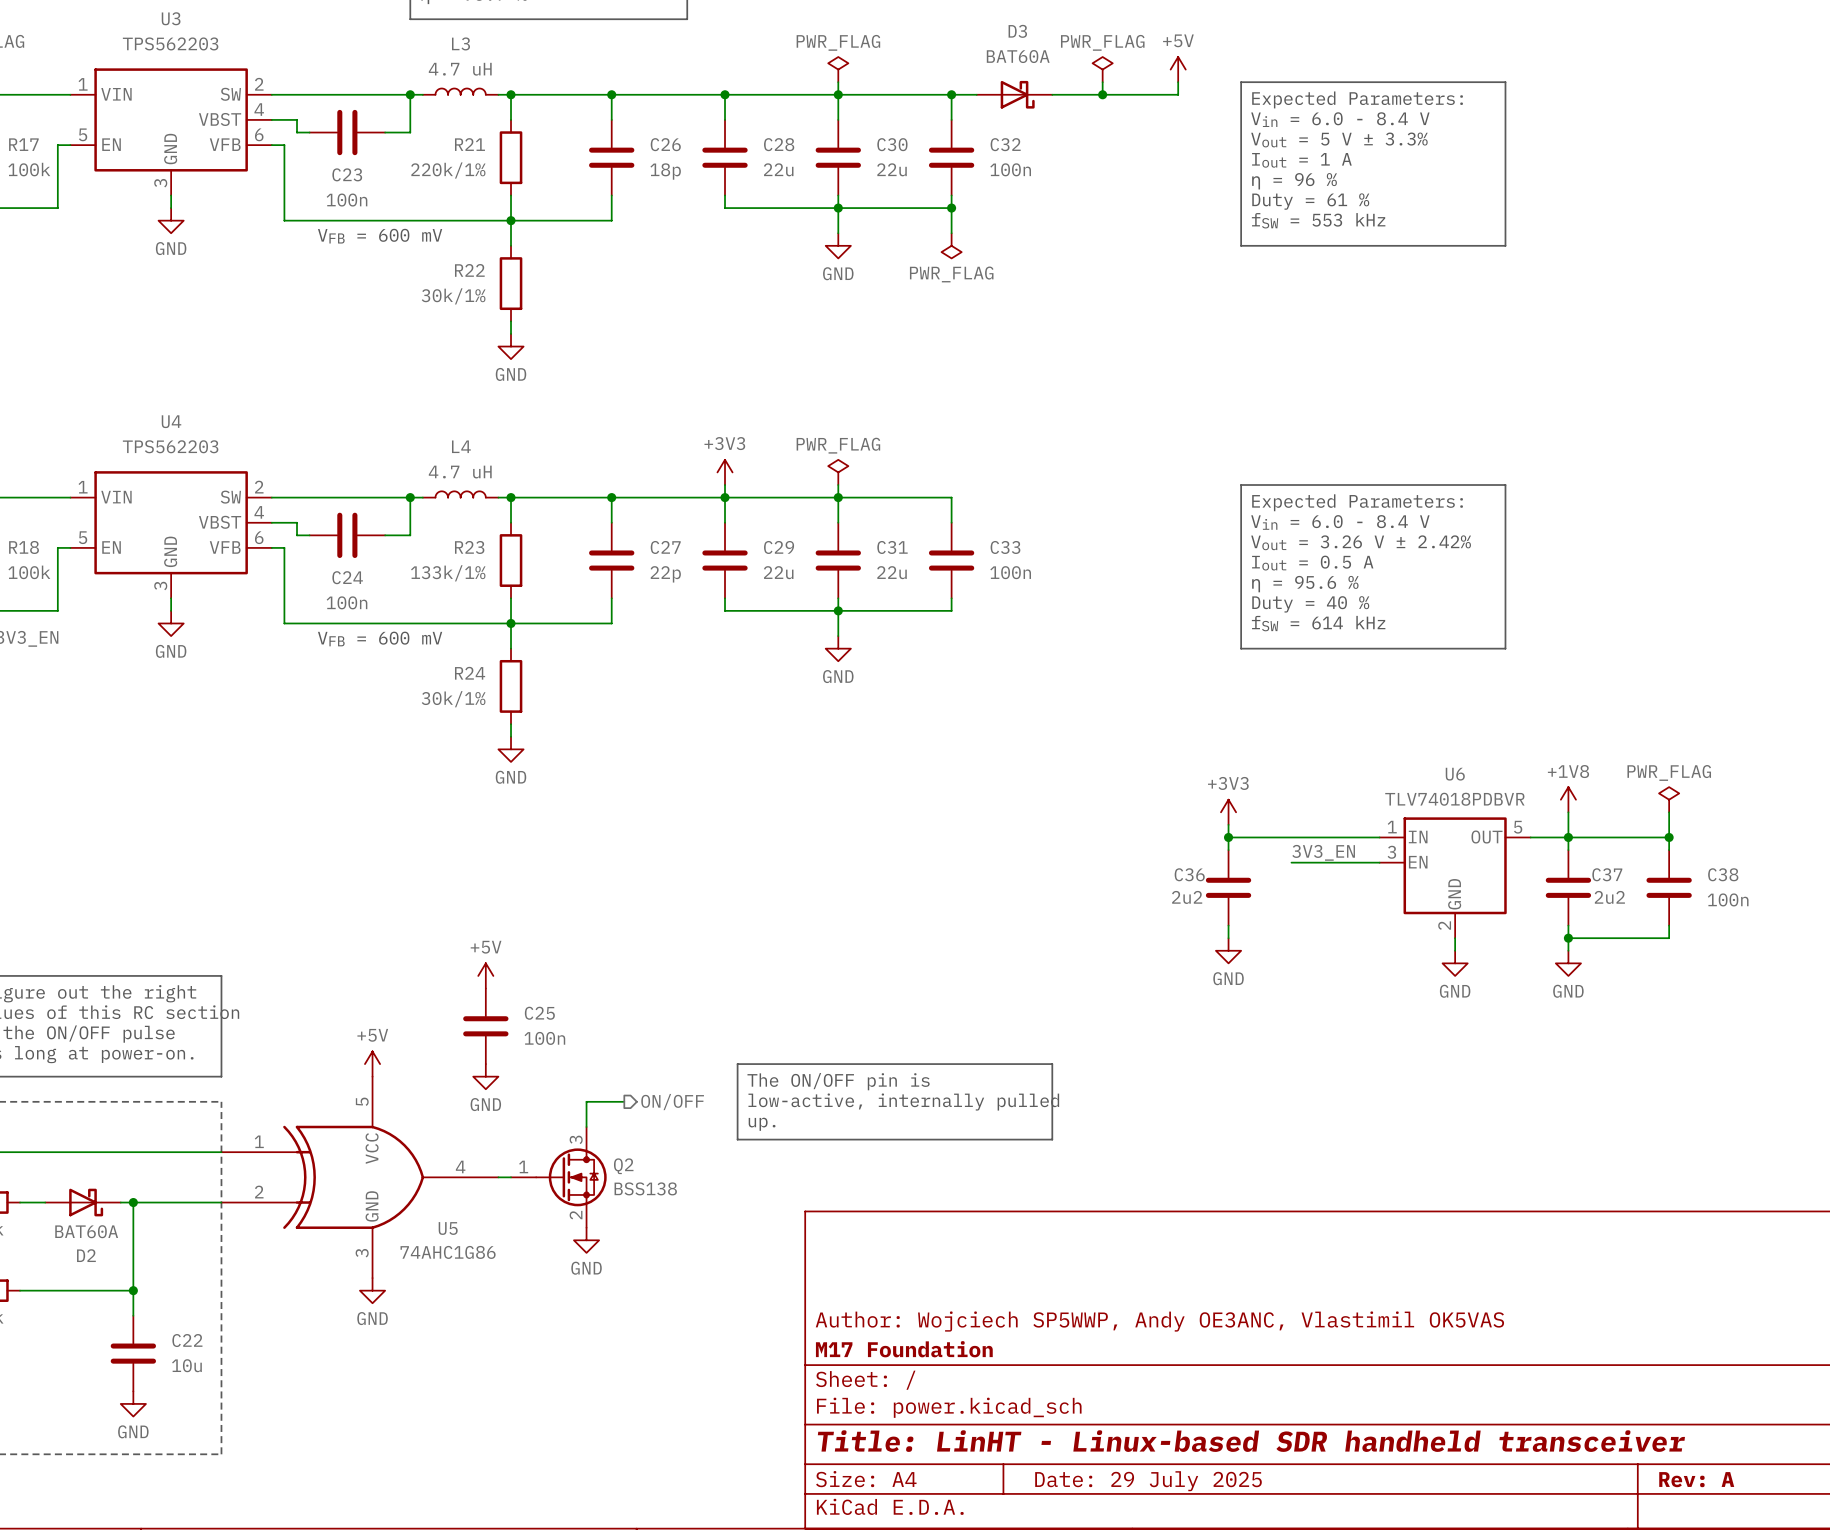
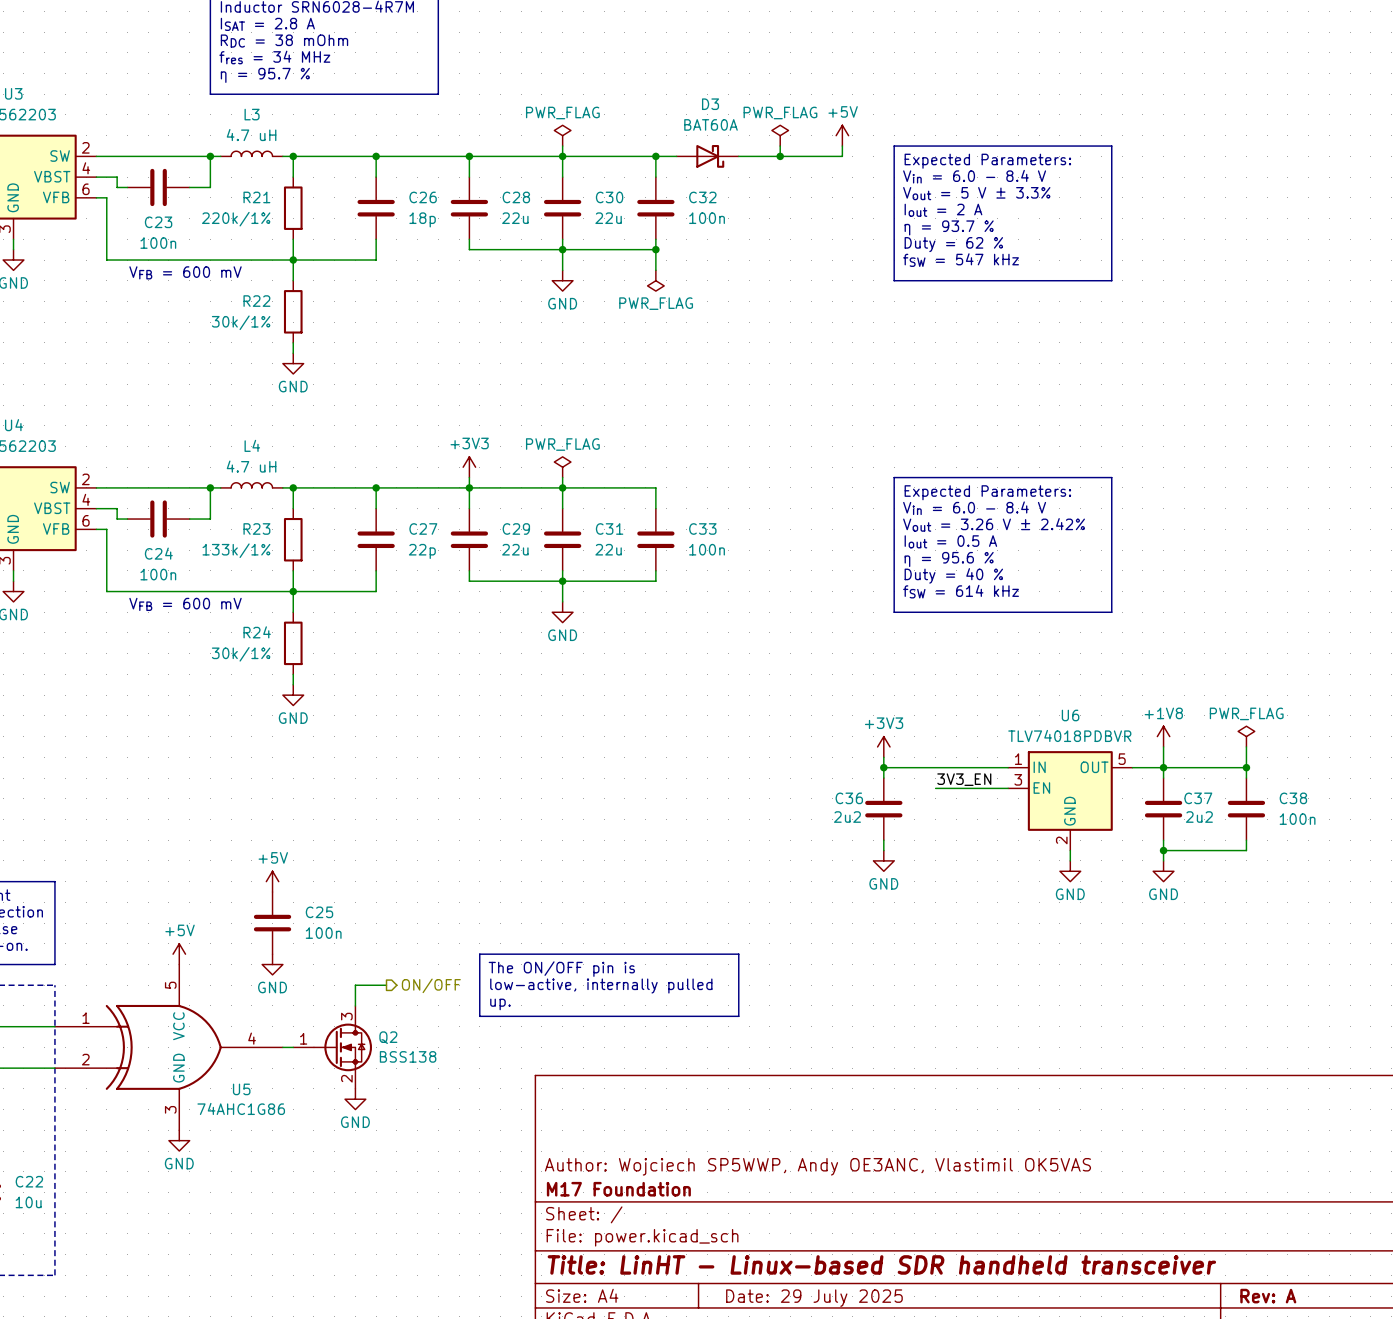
text: Iout = 1 A (1301, 160) -> Iout = 2 A (943, 210)
text: η = 96 % (1294, 181) -> η = 93.7 % (949, 227)
text: Duty = 61 % (1310, 201) -> Duty = 62 % (953, 244)
text: fSW = 553 kHz (1318, 220) -> fSW = 547 kHz (961, 260)

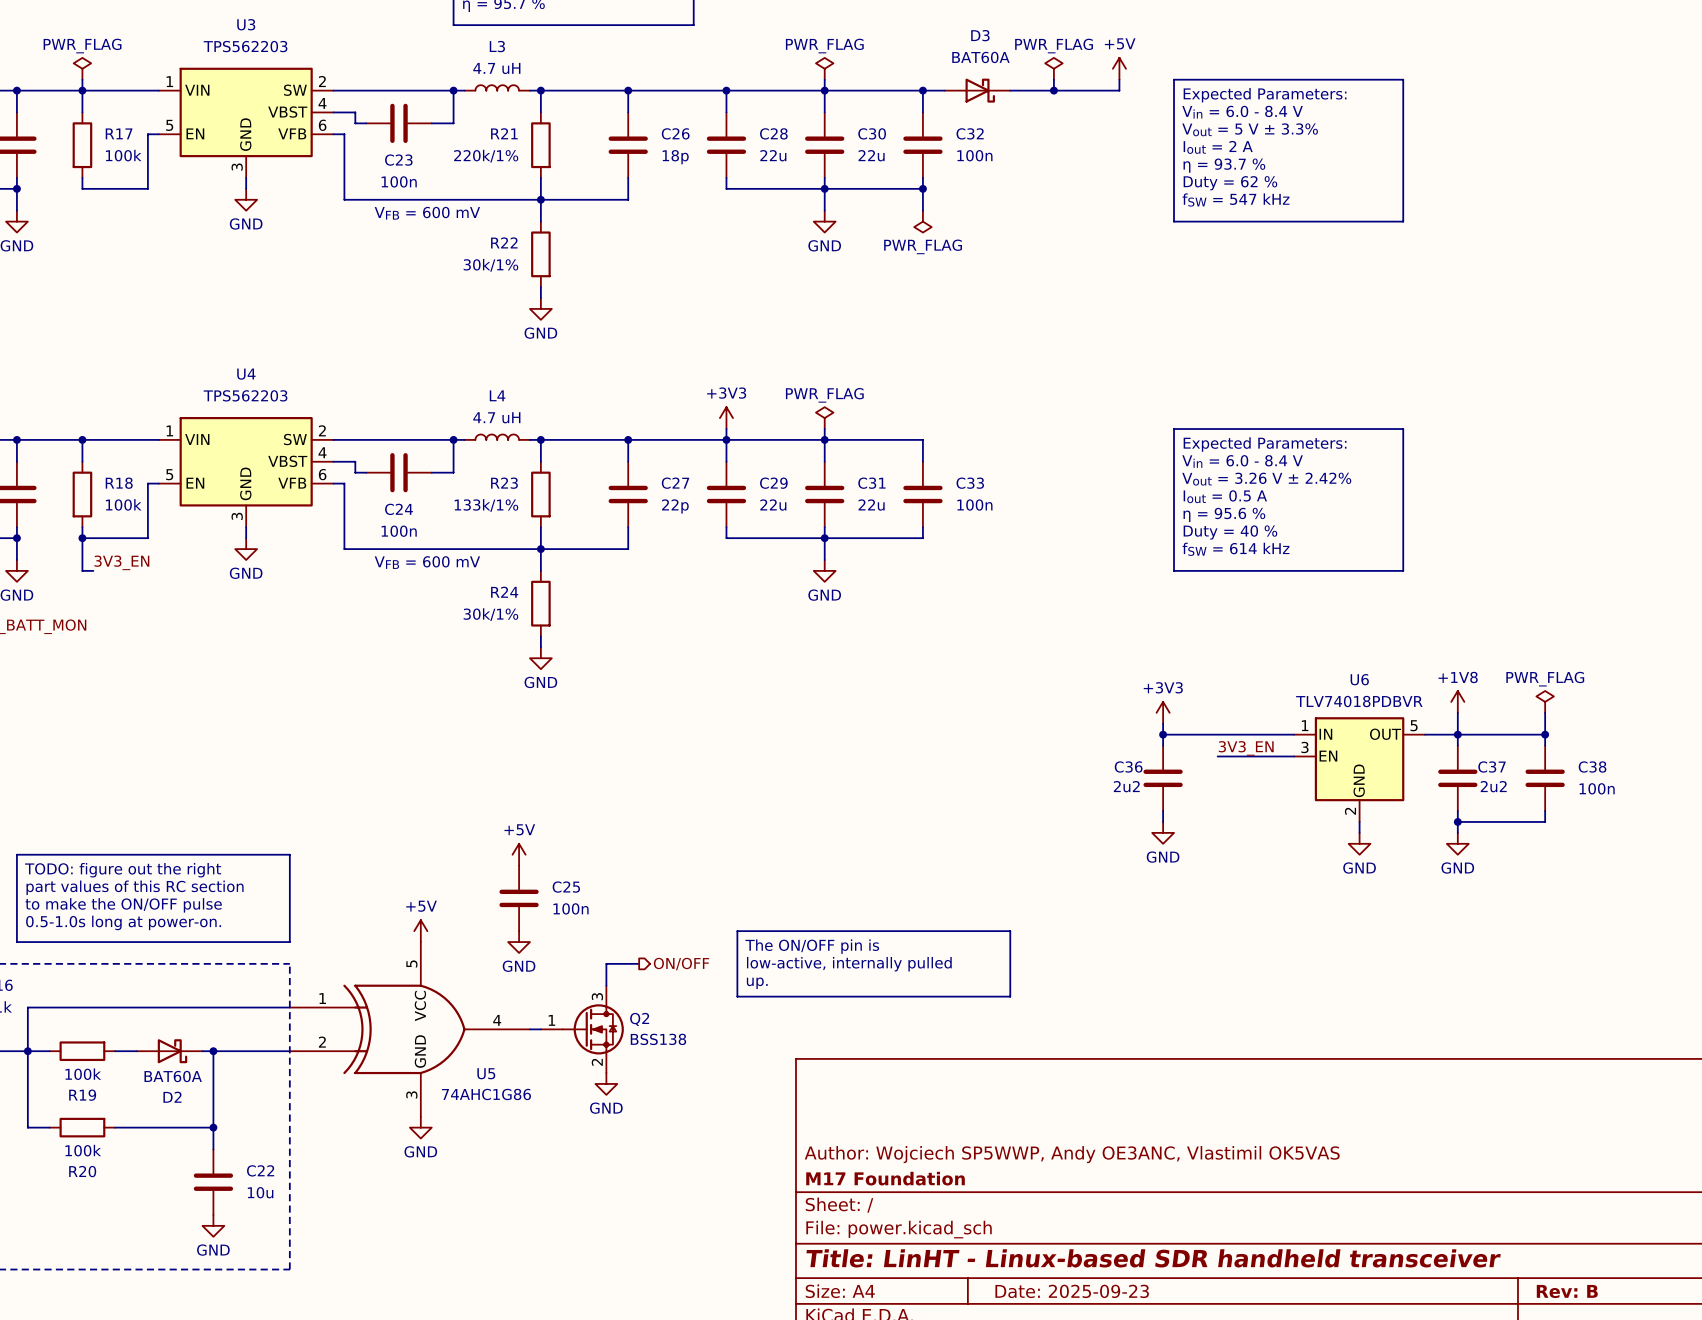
title block: Rev: A (1268, 1296) -> Rev: B (1567, 1291)
title block: Date: 29 July 2025 (814, 1298) -> Date: 2025-09-23 (1072, 1291)

